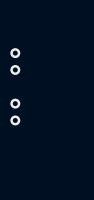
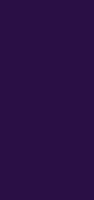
via: (15, 53) -> none
via: (15, 69) -> none
via: (15, 103) -> none
via: (15, 120) -> none

